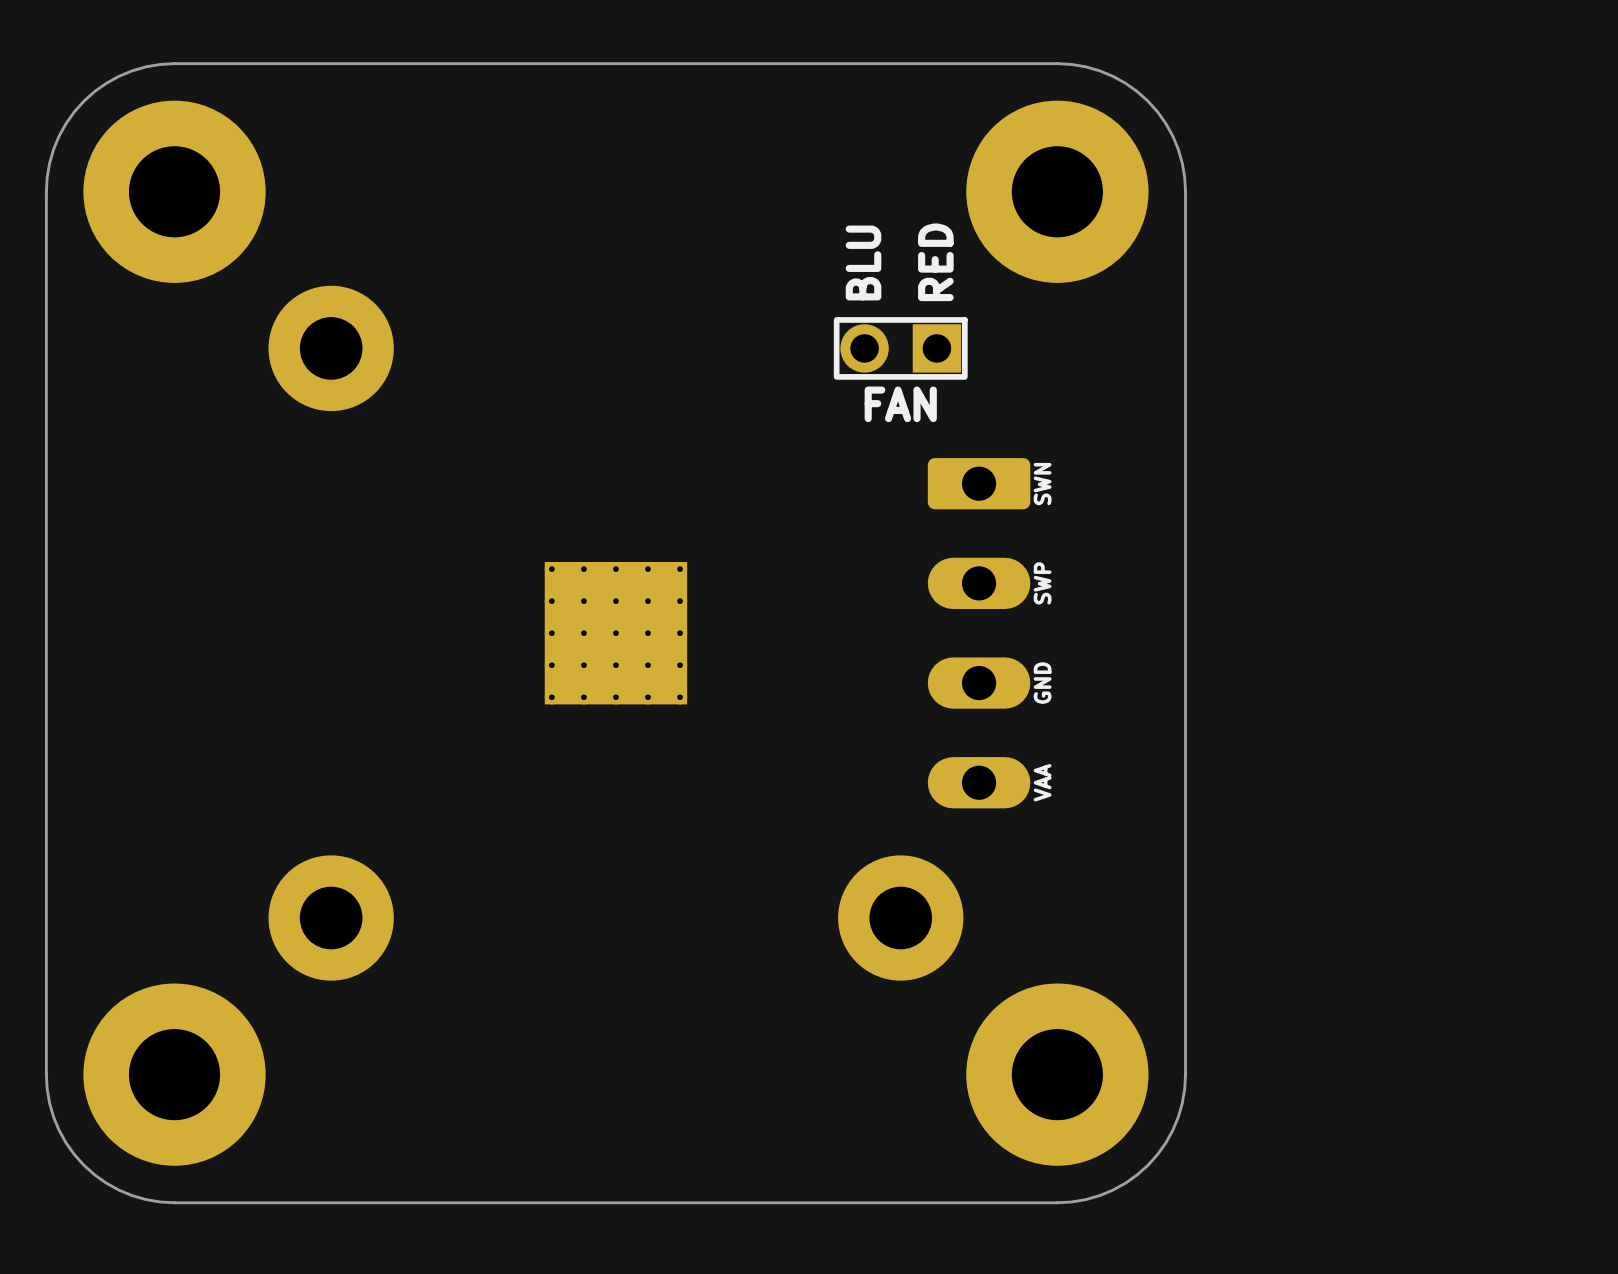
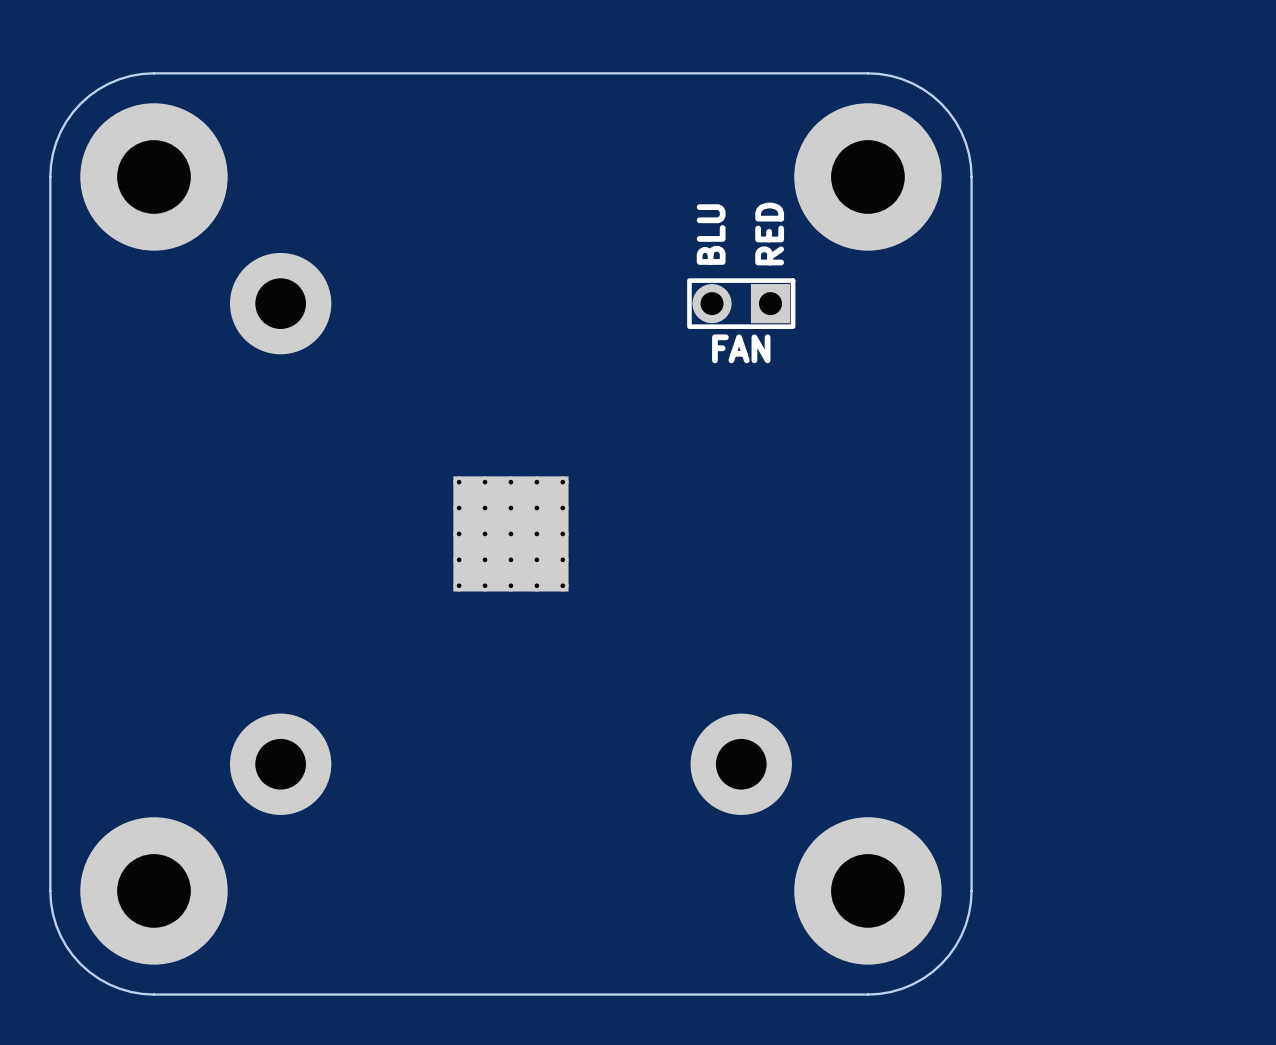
text: SWN (1042, 484) -> none
text: SWP (1042, 583) -> none
part: (979, 633) -> none
text: GND (1042, 683) -> none
text: VAA (1042, 782) -> none

